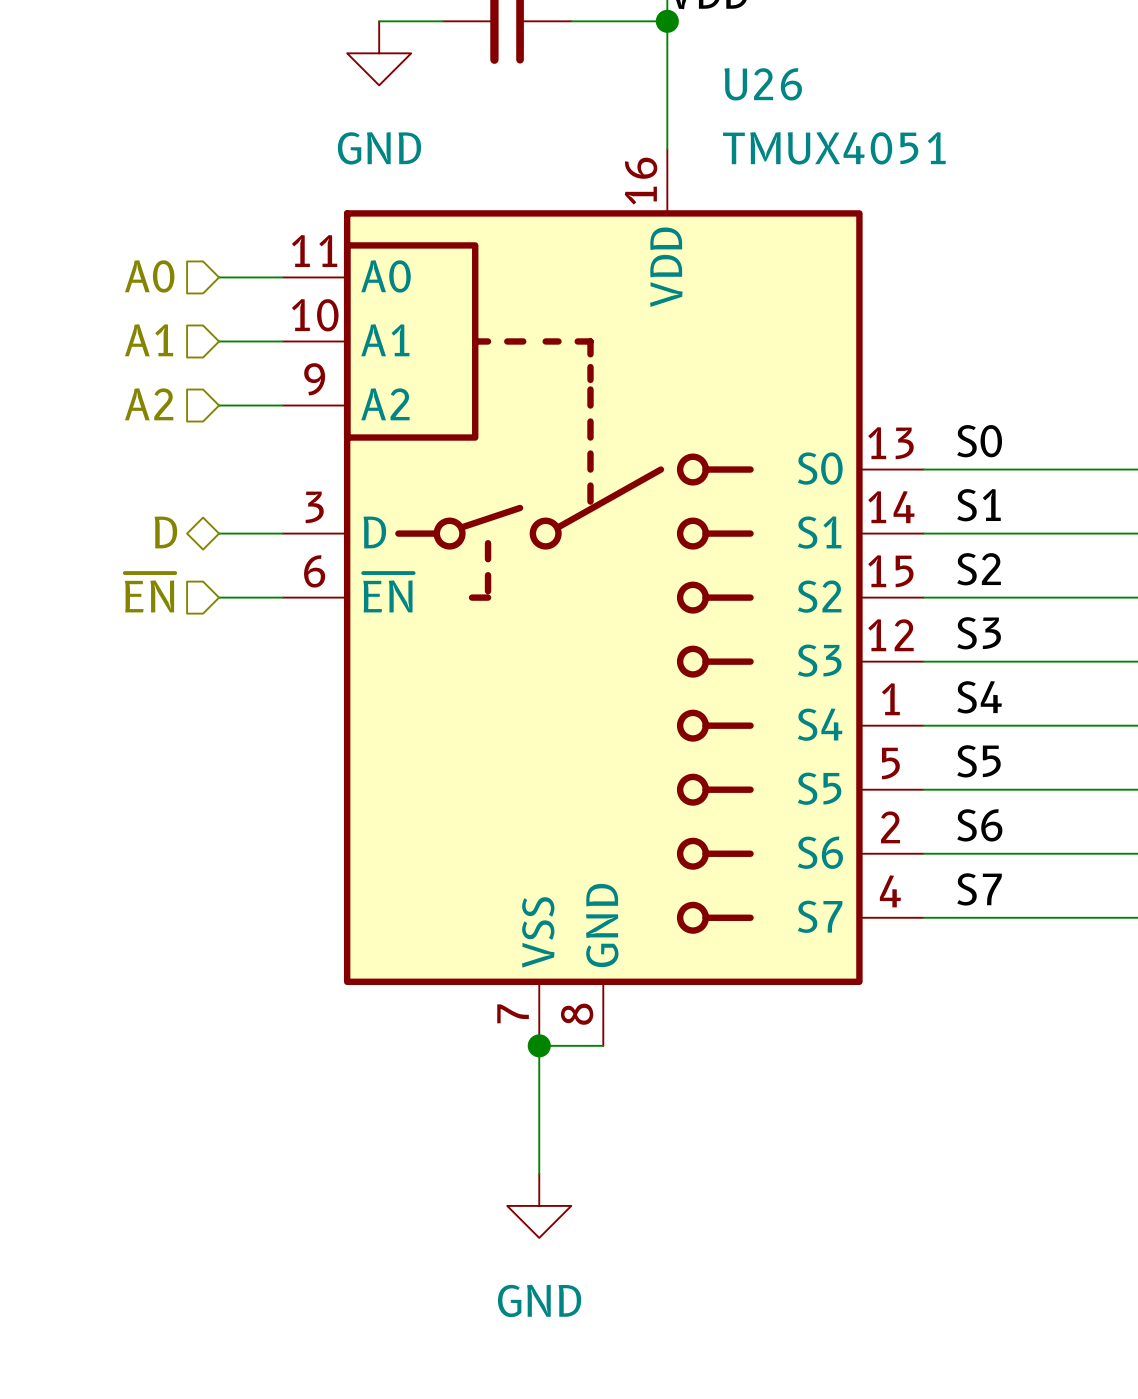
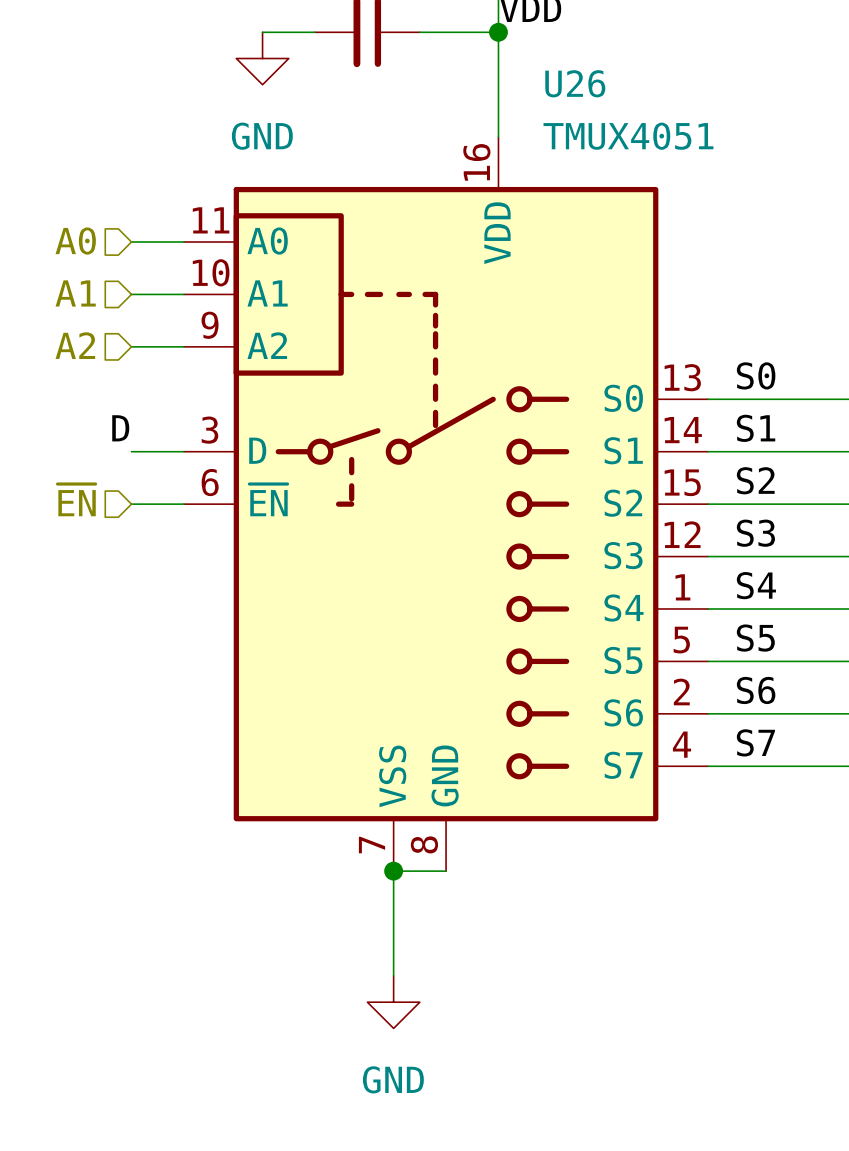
label: none -> D (120, 428)
hierarchical label: D (165, 532) -> none

